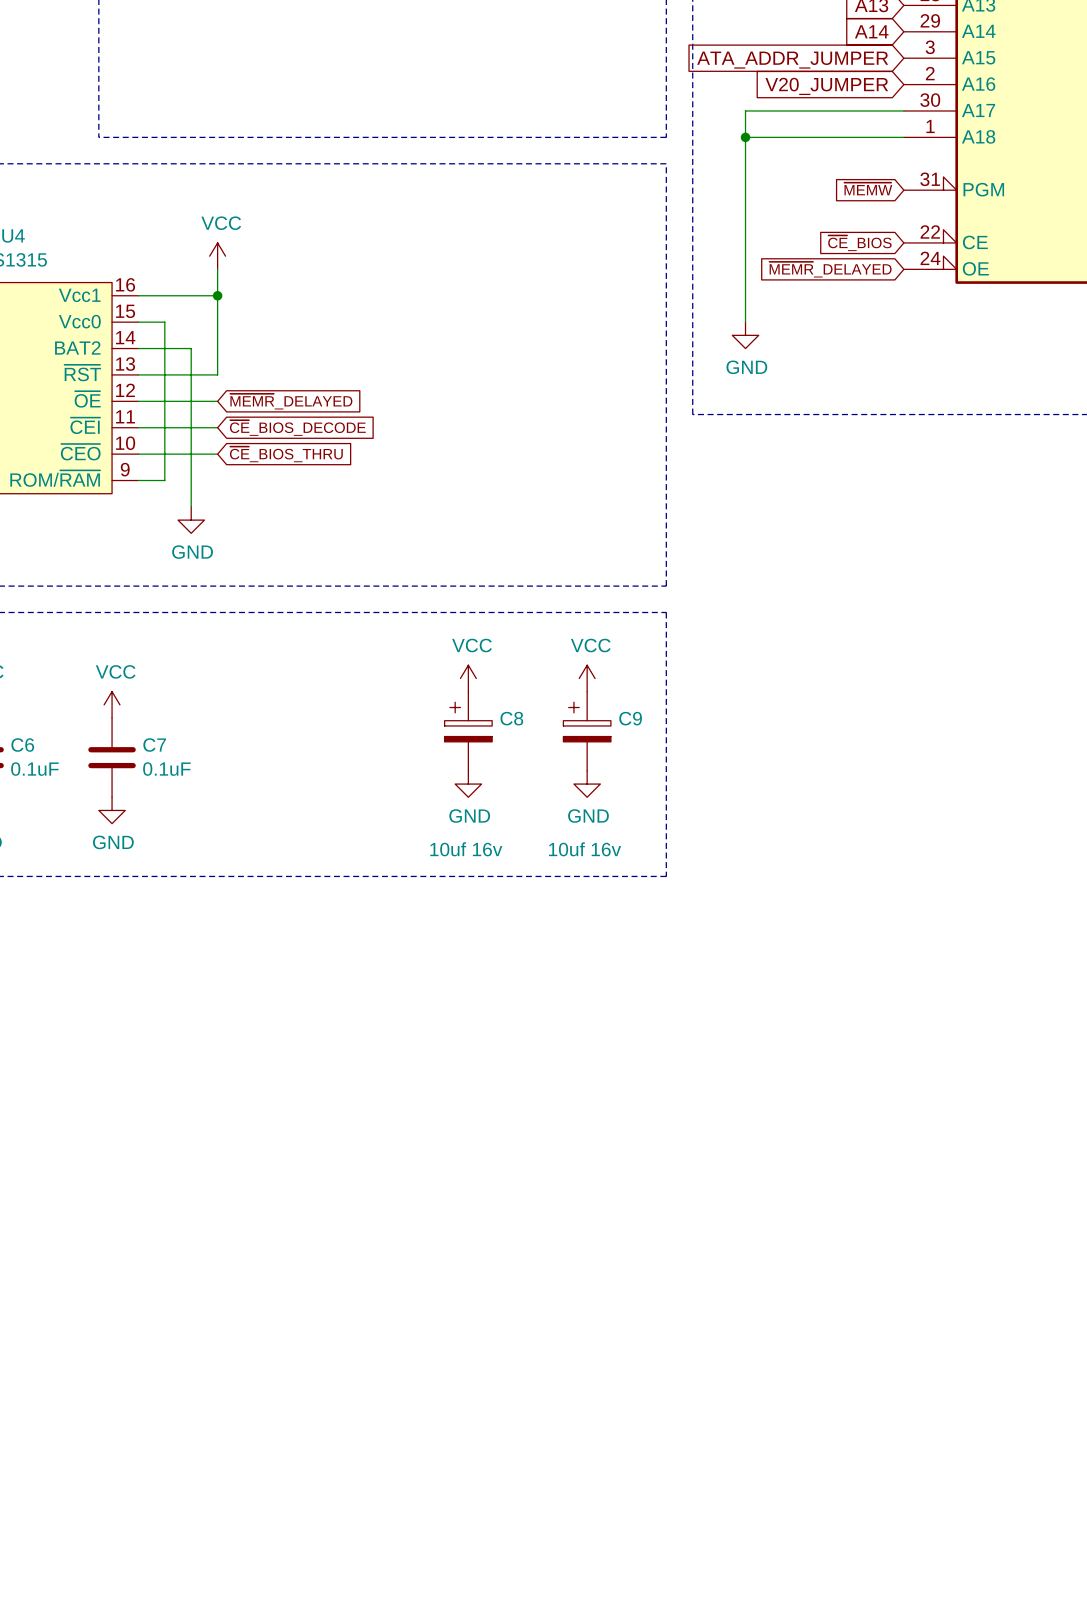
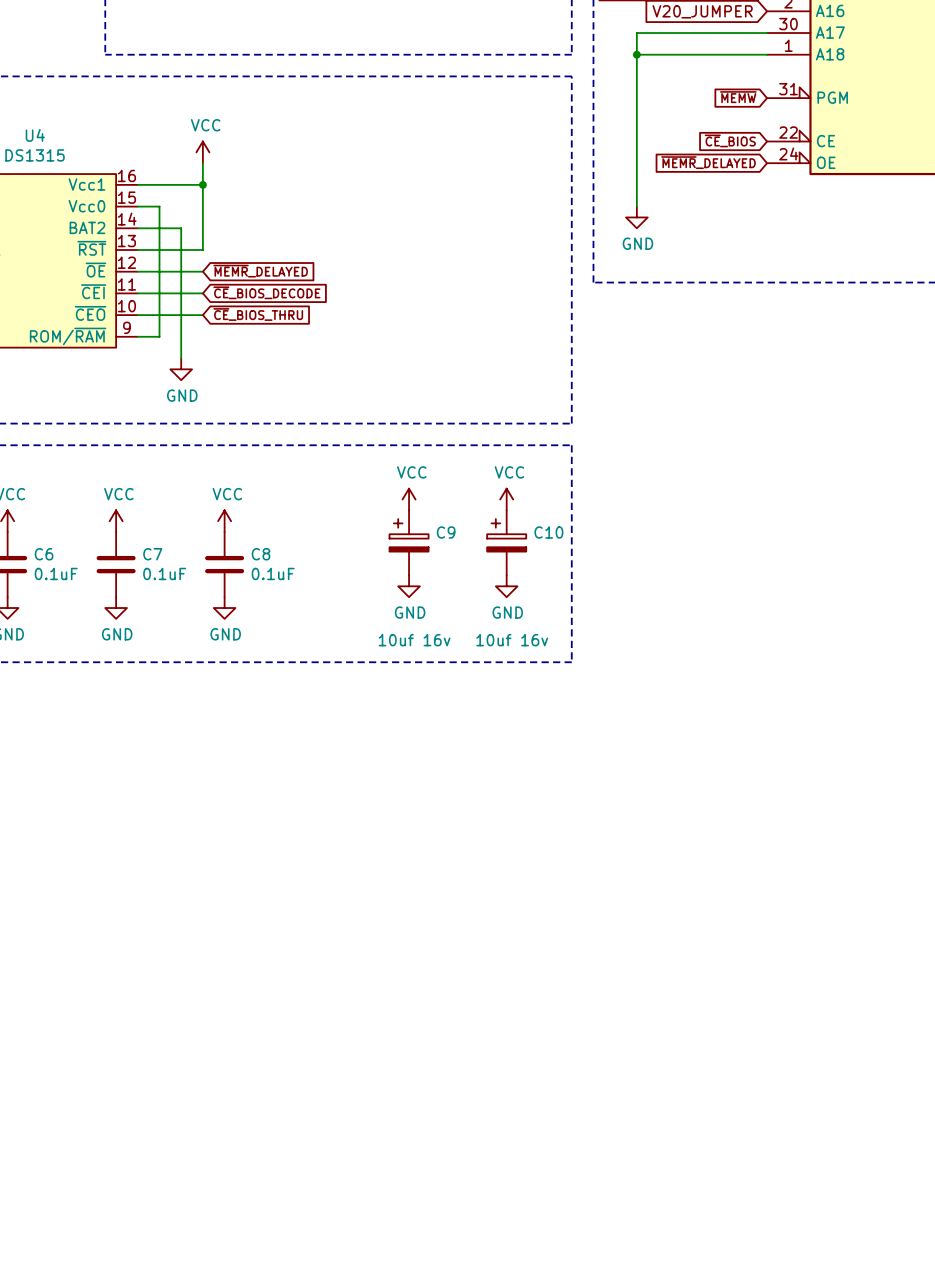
power symbol: none -> VCC (224, 521)
C8 name: C8 (511, 718) -> C9 (446, 532)
C9 name: C9 (630, 718) -> C10 (548, 532)
C8: none -> 0.1uF (224, 564)
power symbol: none -> GND (224, 608)

